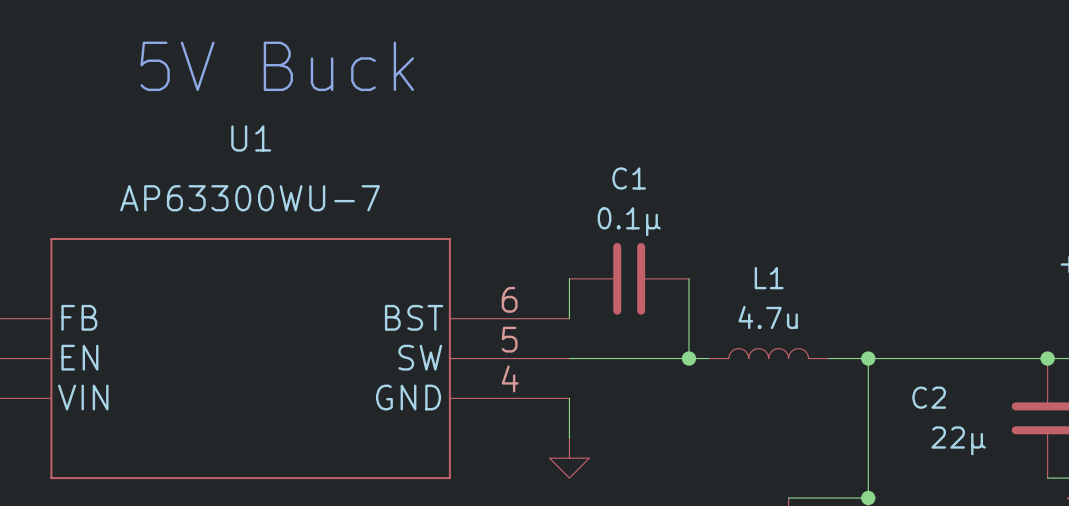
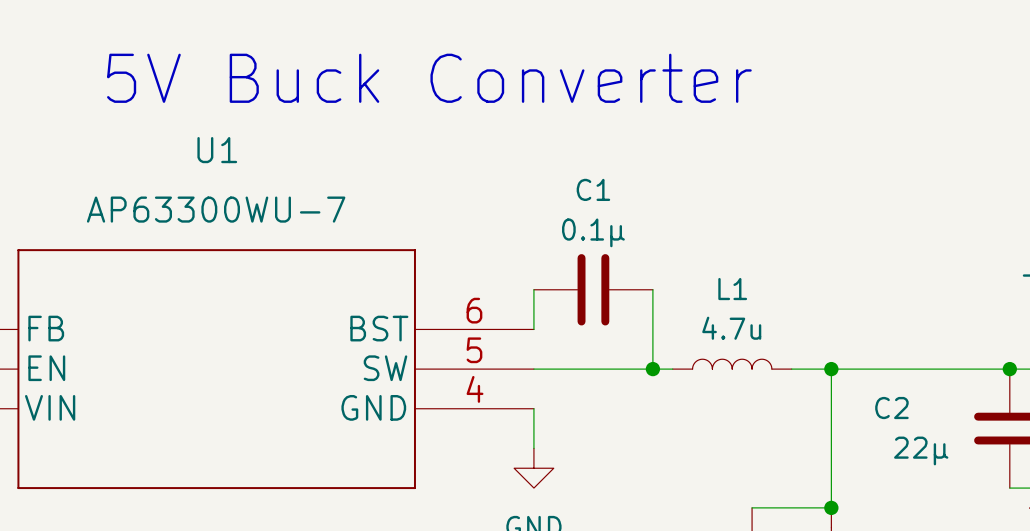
text: 5V Buck (277, 66) -> 5V Buck Converter (429, 78)

